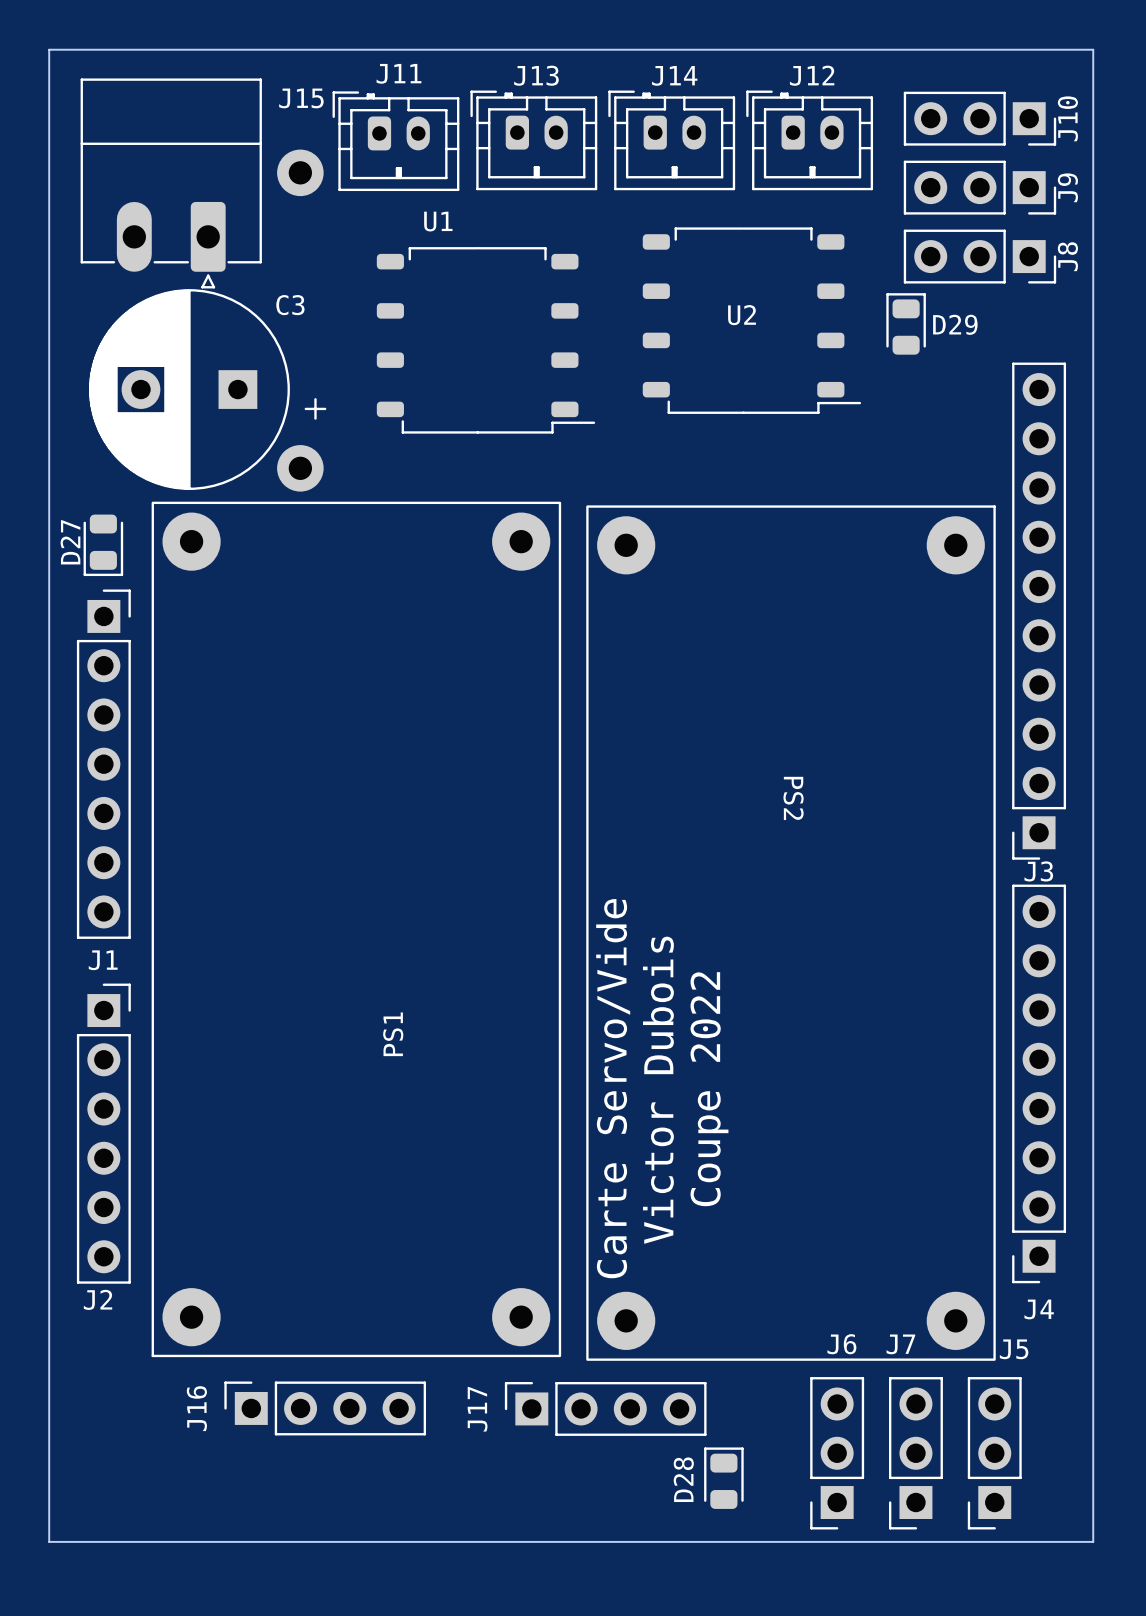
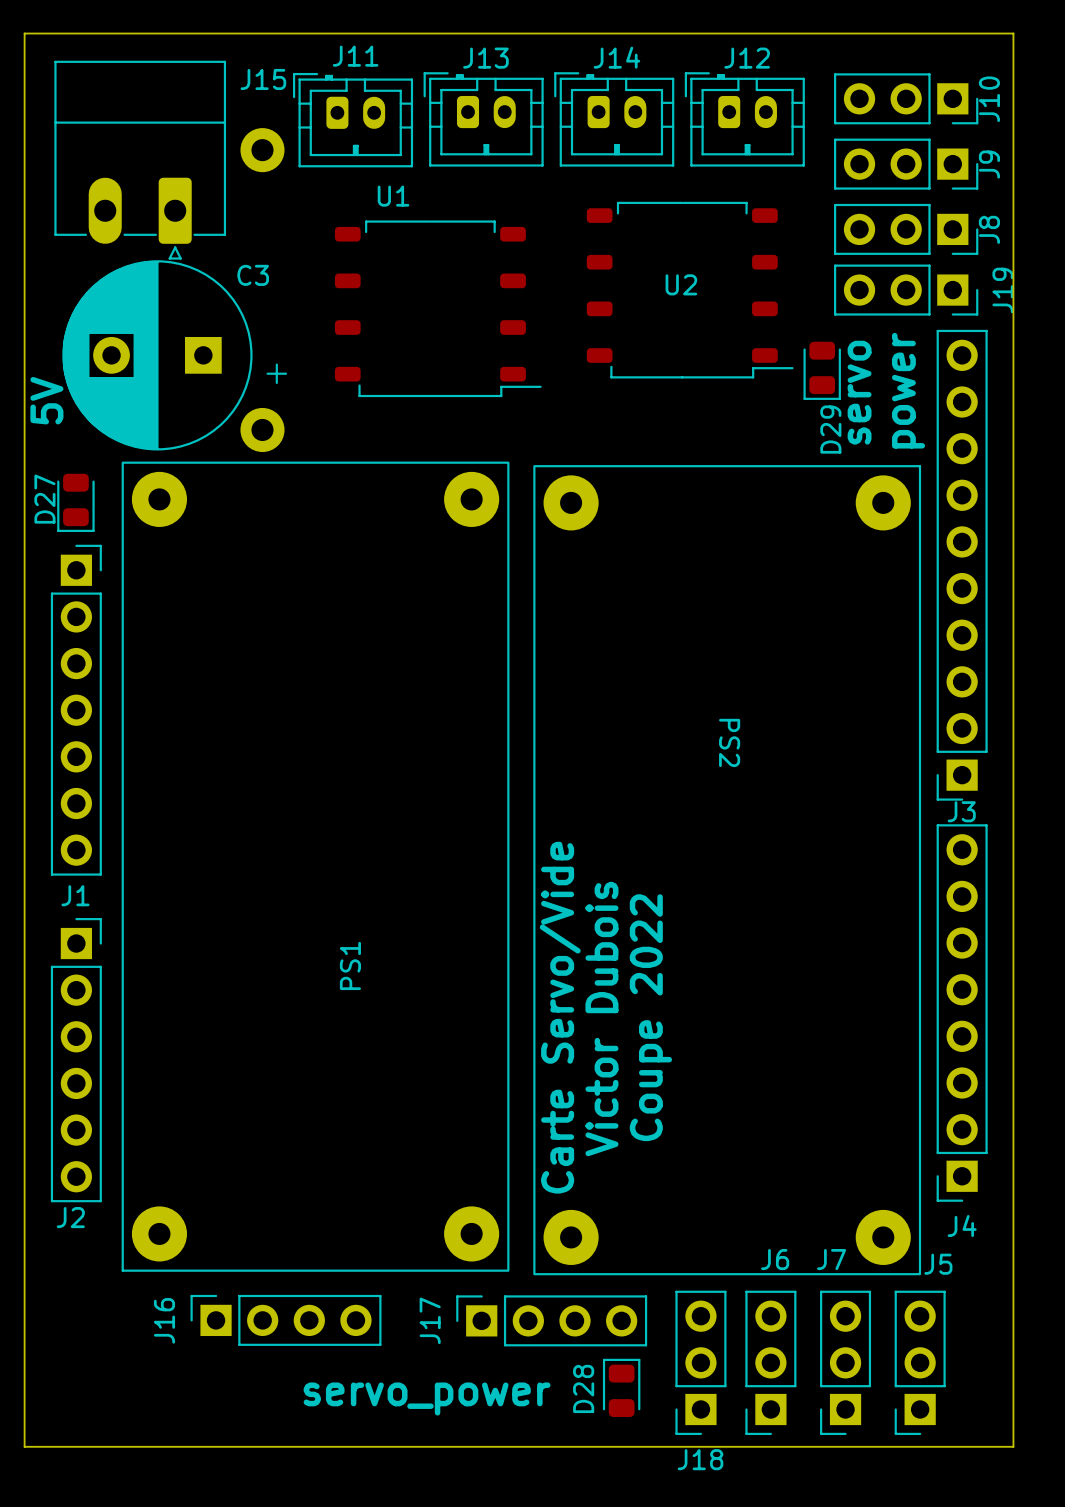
J19: none -> (906, 290)
D29 rotation: 0° (906, 323) -> 180° (822, 370)
D29 position: (906, 323) -> (822, 370)
D29 name position: D29 (955, 324) -> D29 (830, 429)
text: none -> power (908, 390)
text: none -> servo (859, 392)
text: none -> 5V (46, 400)
J18: none -> (700, 1362)
D28 position: (723, 1478) -> (621, 1387)
text: none -> servo_power (427, 1398)

